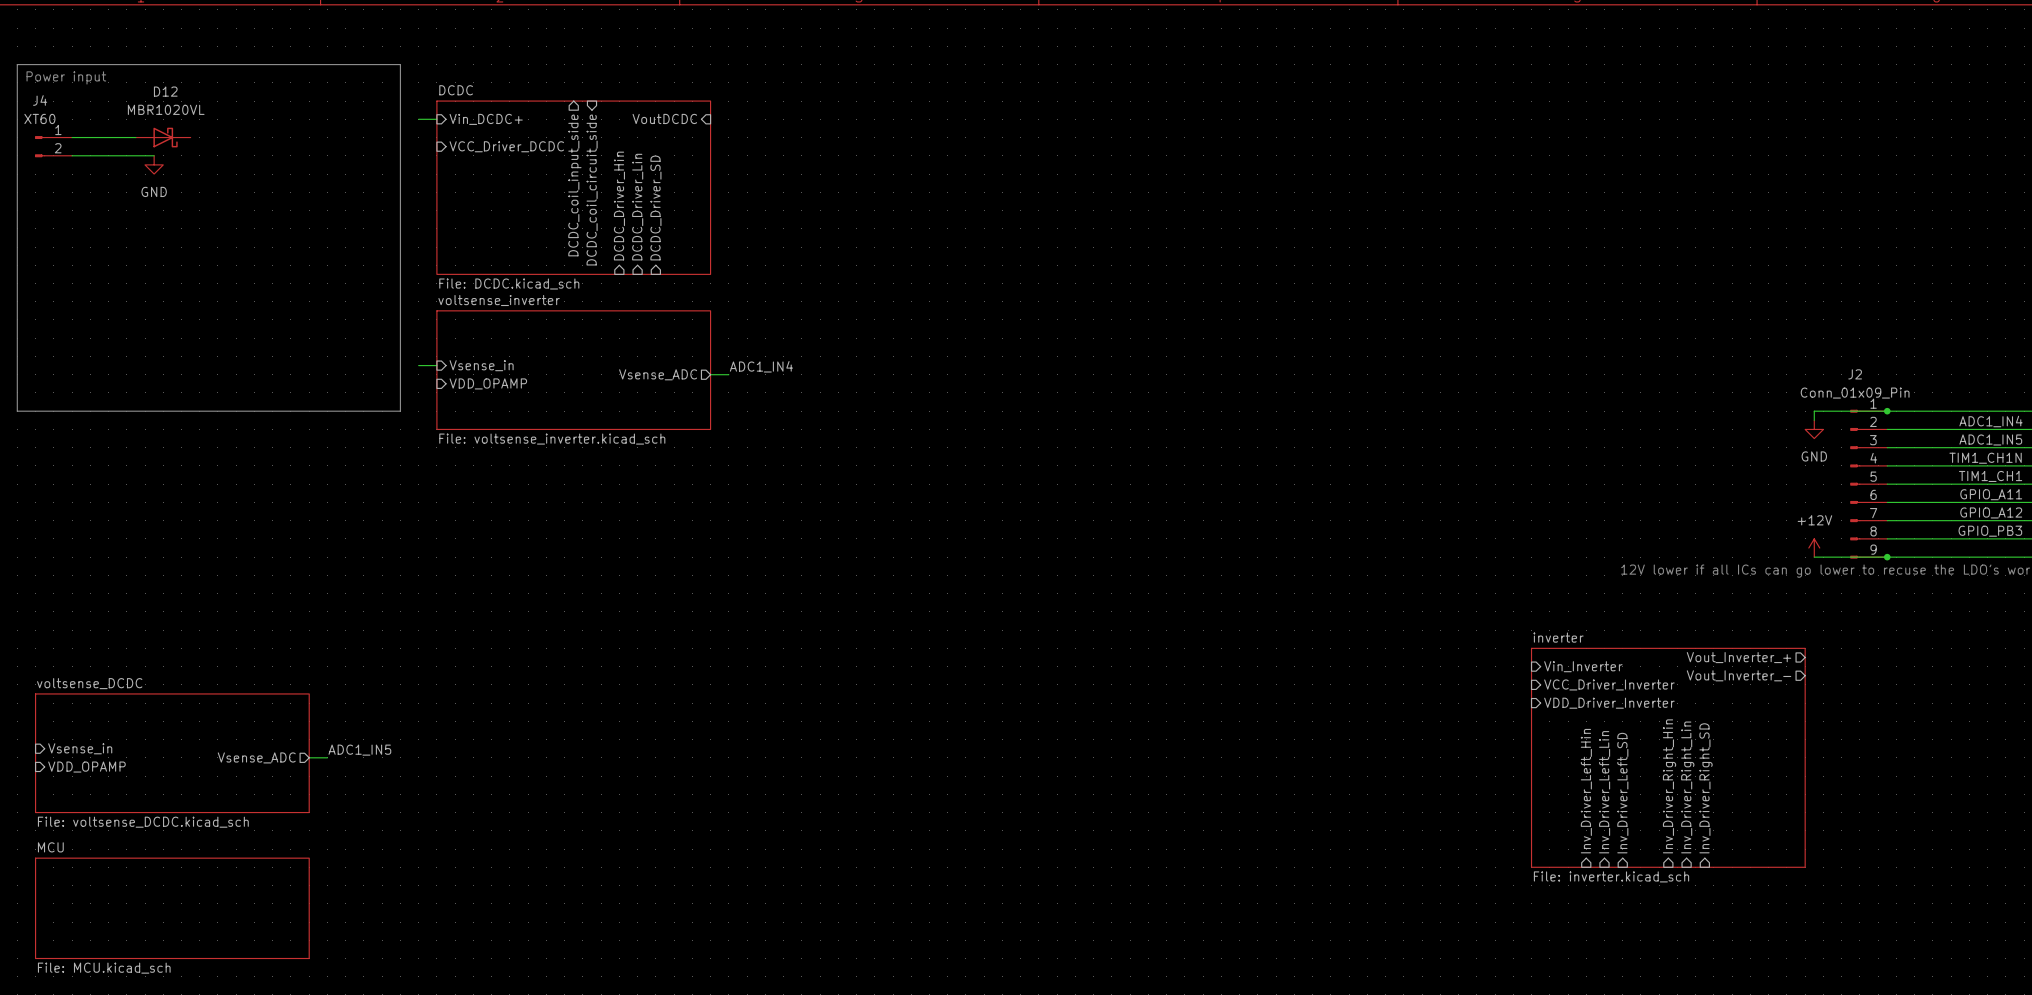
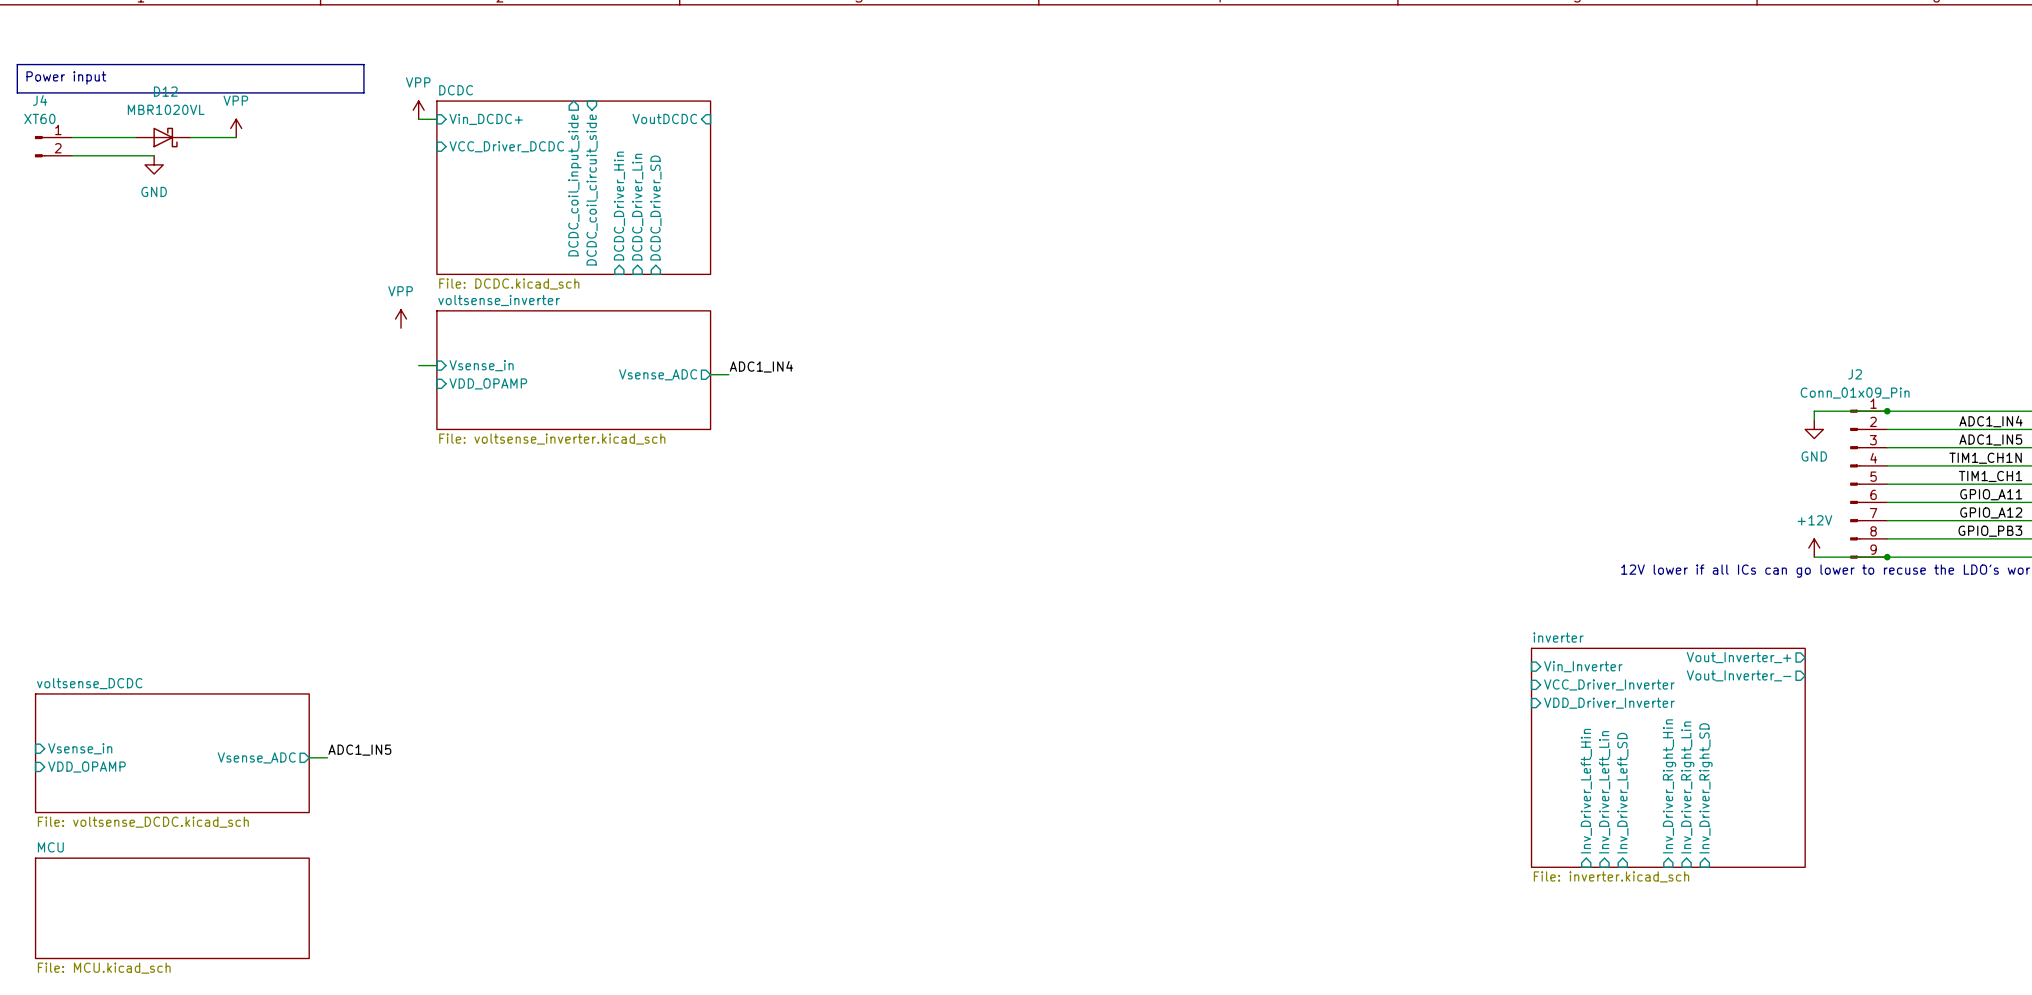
line: (363, 64) (400, 64) (400, 411) (17, 411) (17, 92) -> (363, 64) (363, 92) (17, 92)
power symbol: none -> VPP (418, 110)
power symbol: none -> VPP (236, 128)
wire: none -> (190, 137) (236, 137)
power symbol: none -> VPP (401, 319)

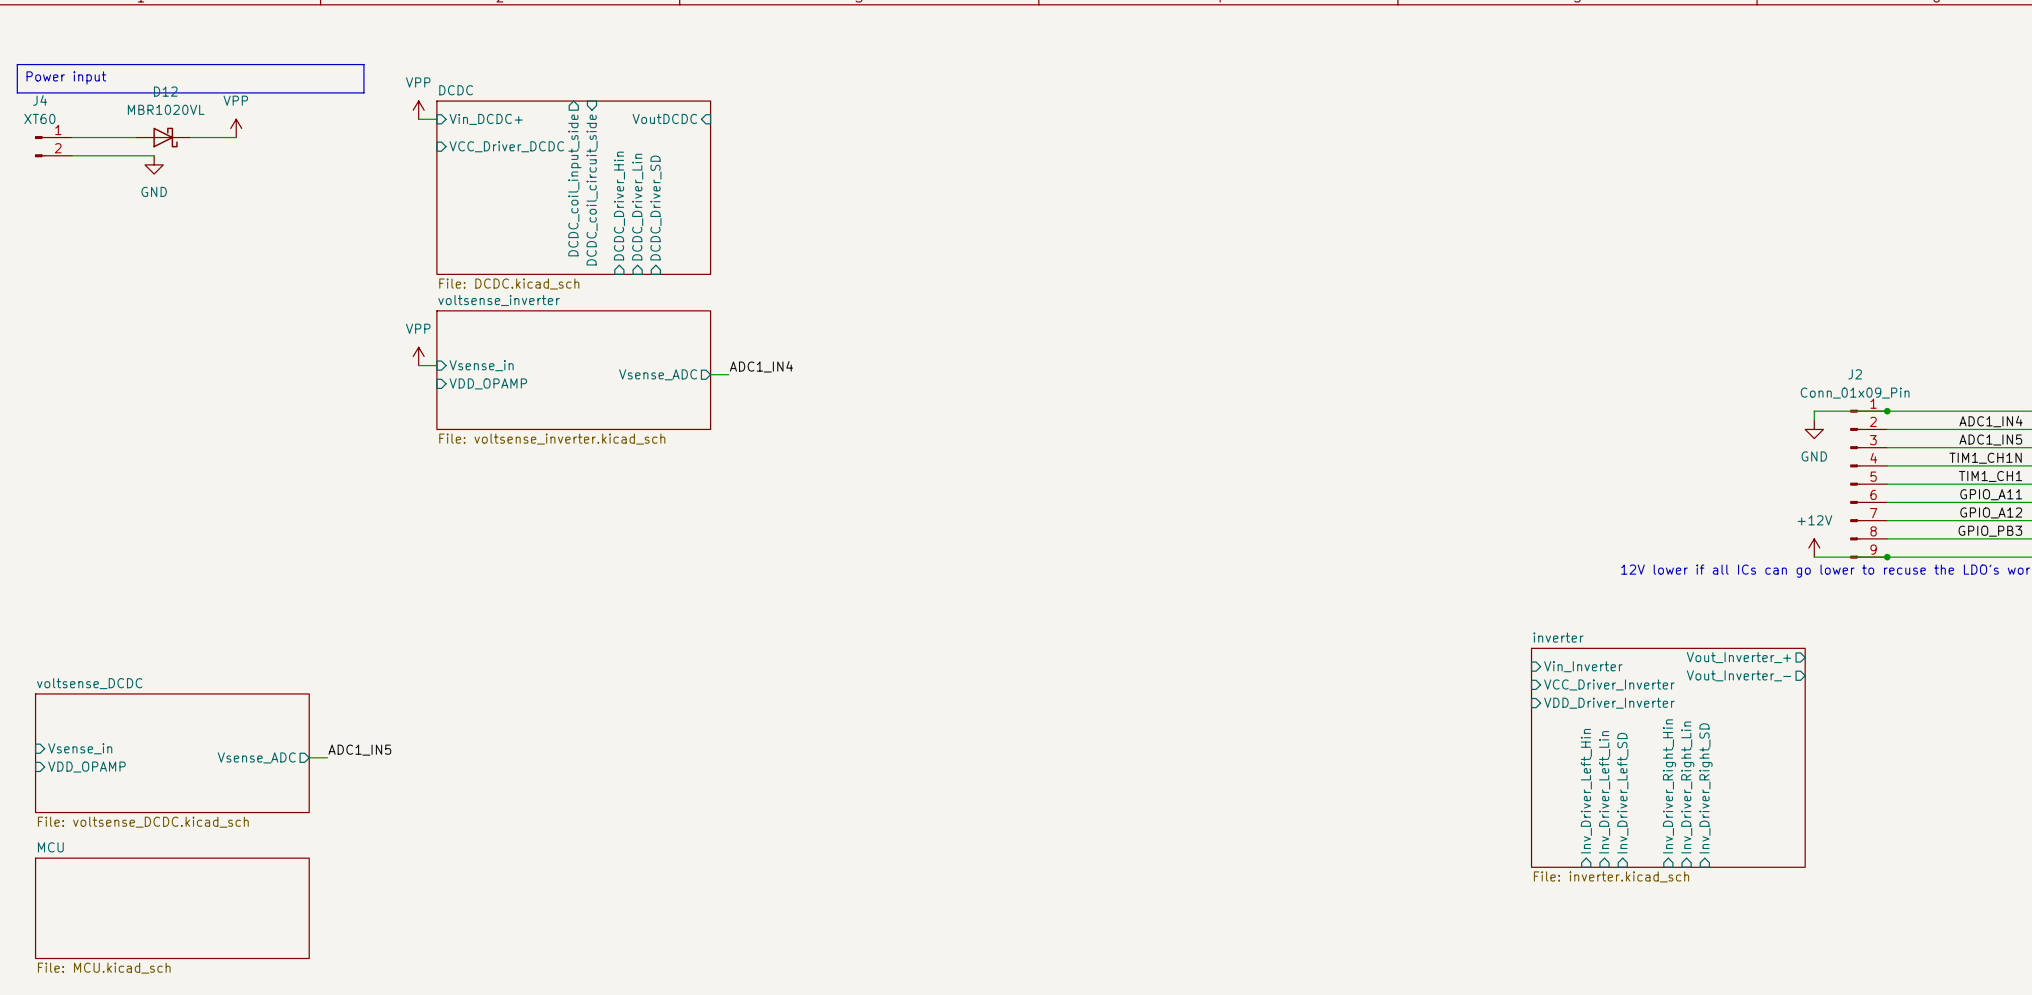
power symbol position: VPP (401, 319) -> VPP (418, 356)

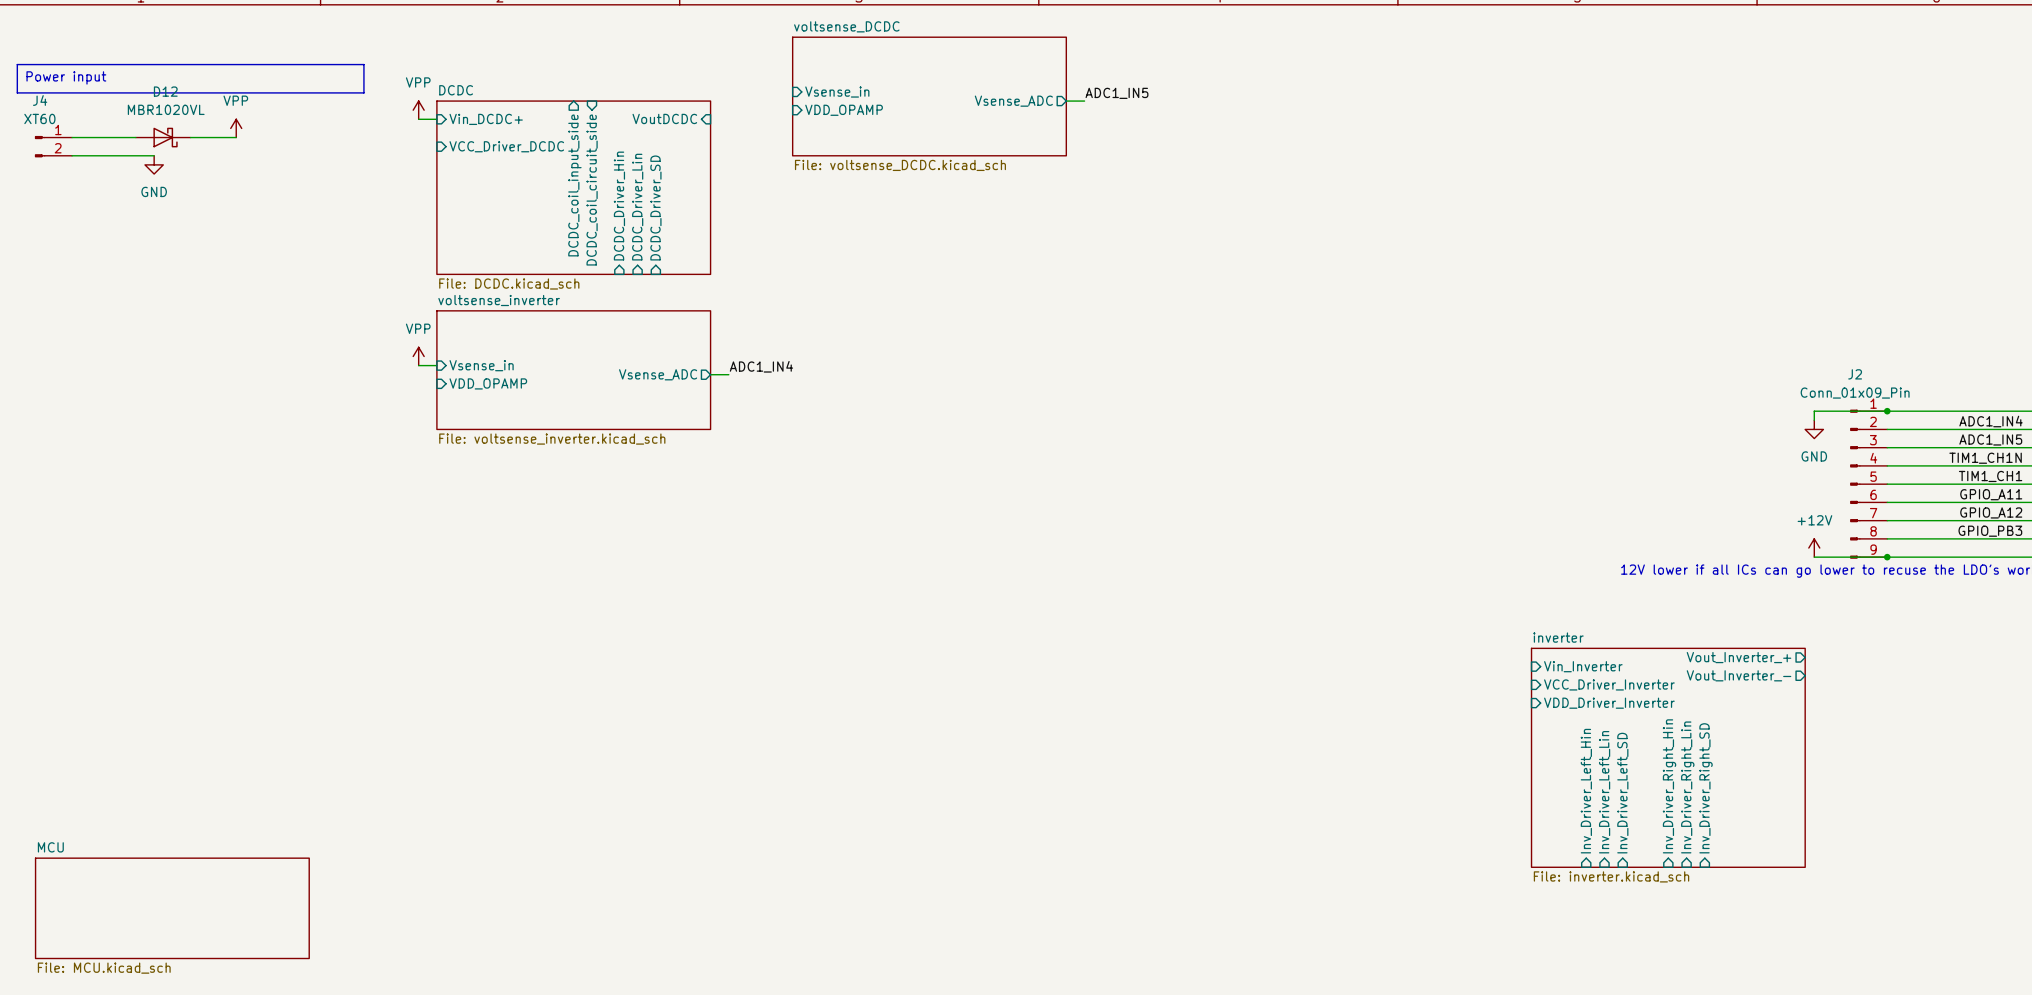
sheet pin: none -> Vsense_in (837, 92)
label: none -> ADC1_IN5 (1116, 93)
sheet voltsense_DCDC: none -> File: voltsense_DCDC.kicad_sch (929, 96)
sheet pin: none -> Vsense_ADC (1013, 101)
wire: none -> (1066, 101) (1084, 101)
sheet pin: none -> VDD_OPAMP (844, 110)
sheet pin: Vsense_in (80, 748) -> none
label: ADC1_IN5 (359, 750) -> none
sheet voltsense_DCDC: File: voltsense_DCDC.kicad_sch (172, 753) -> none
sheet pin: Vsense_ADC (256, 757) -> none
wire: (309, 757) (327, 757) -> none
sheet pin: VDD_OPAMP (86, 767) -> none

